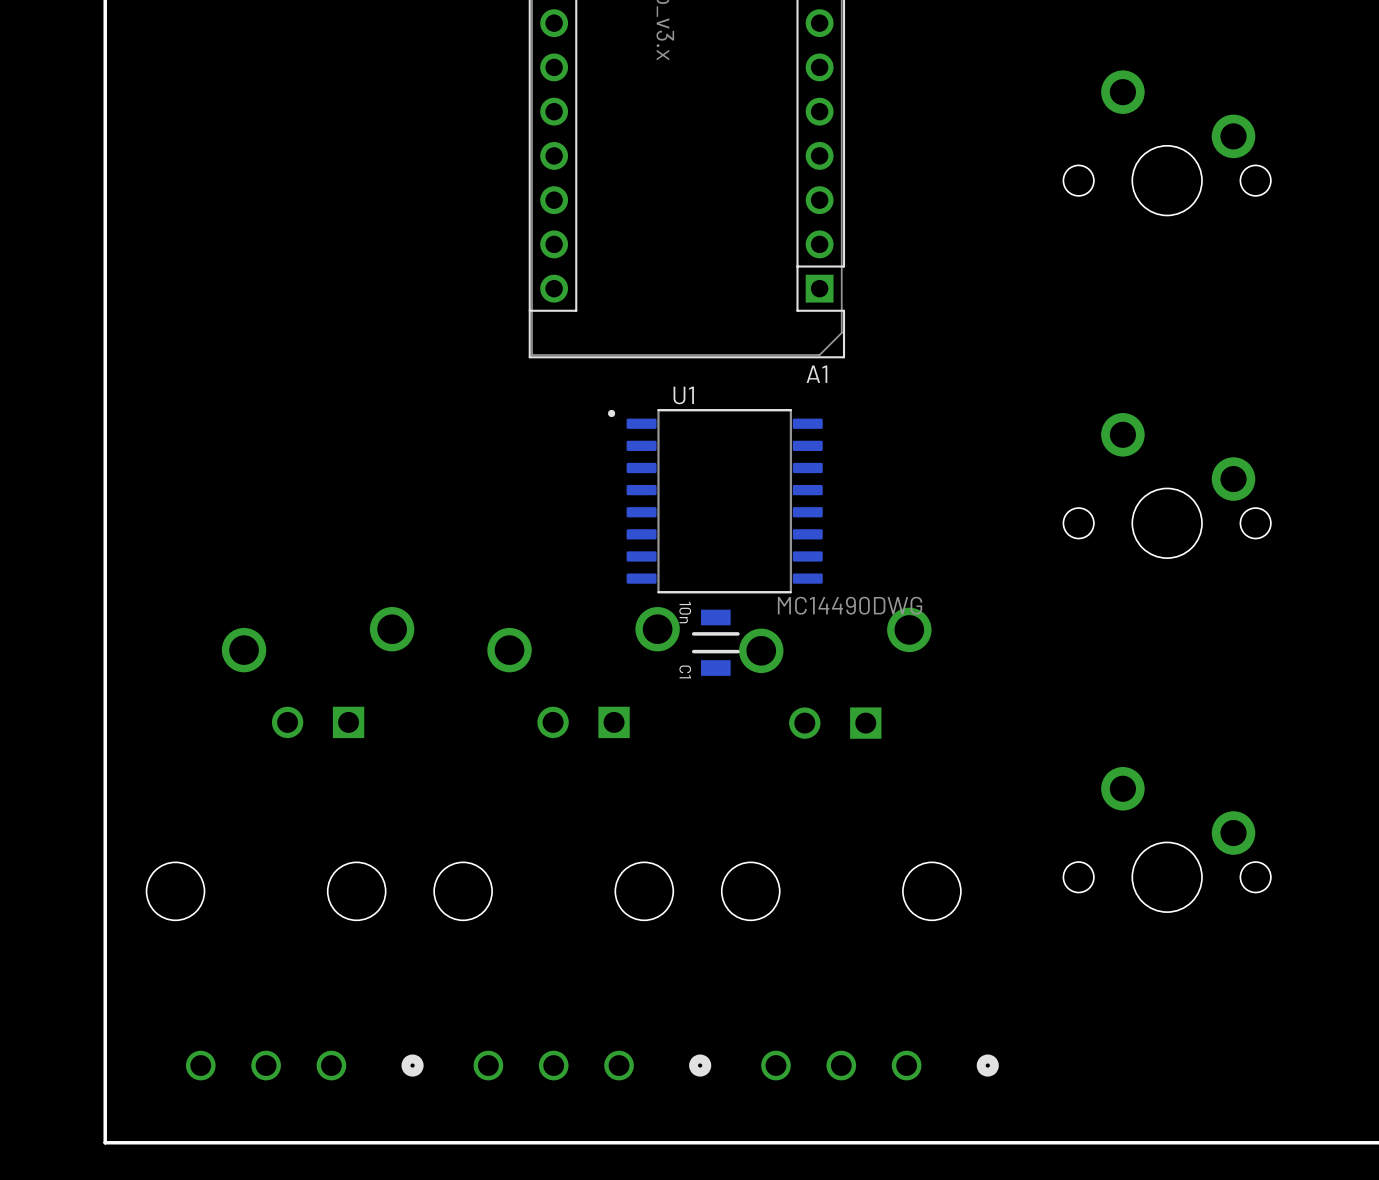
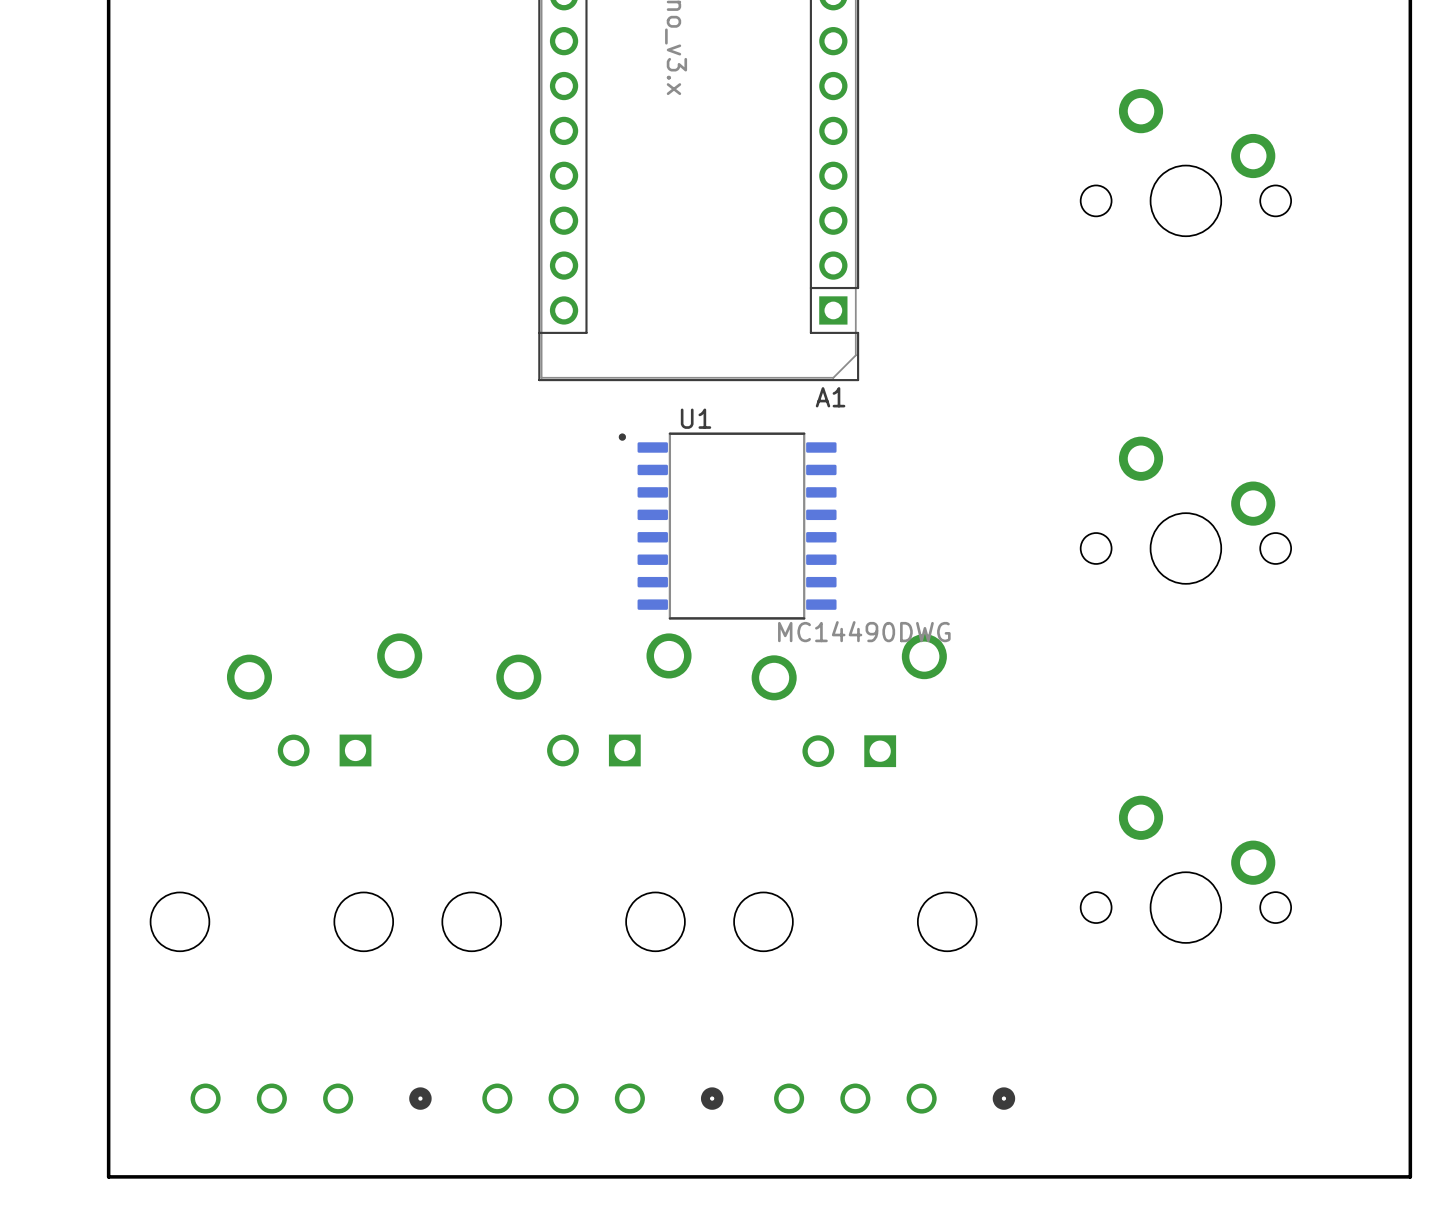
C1: 10n (715, 642) -> none

